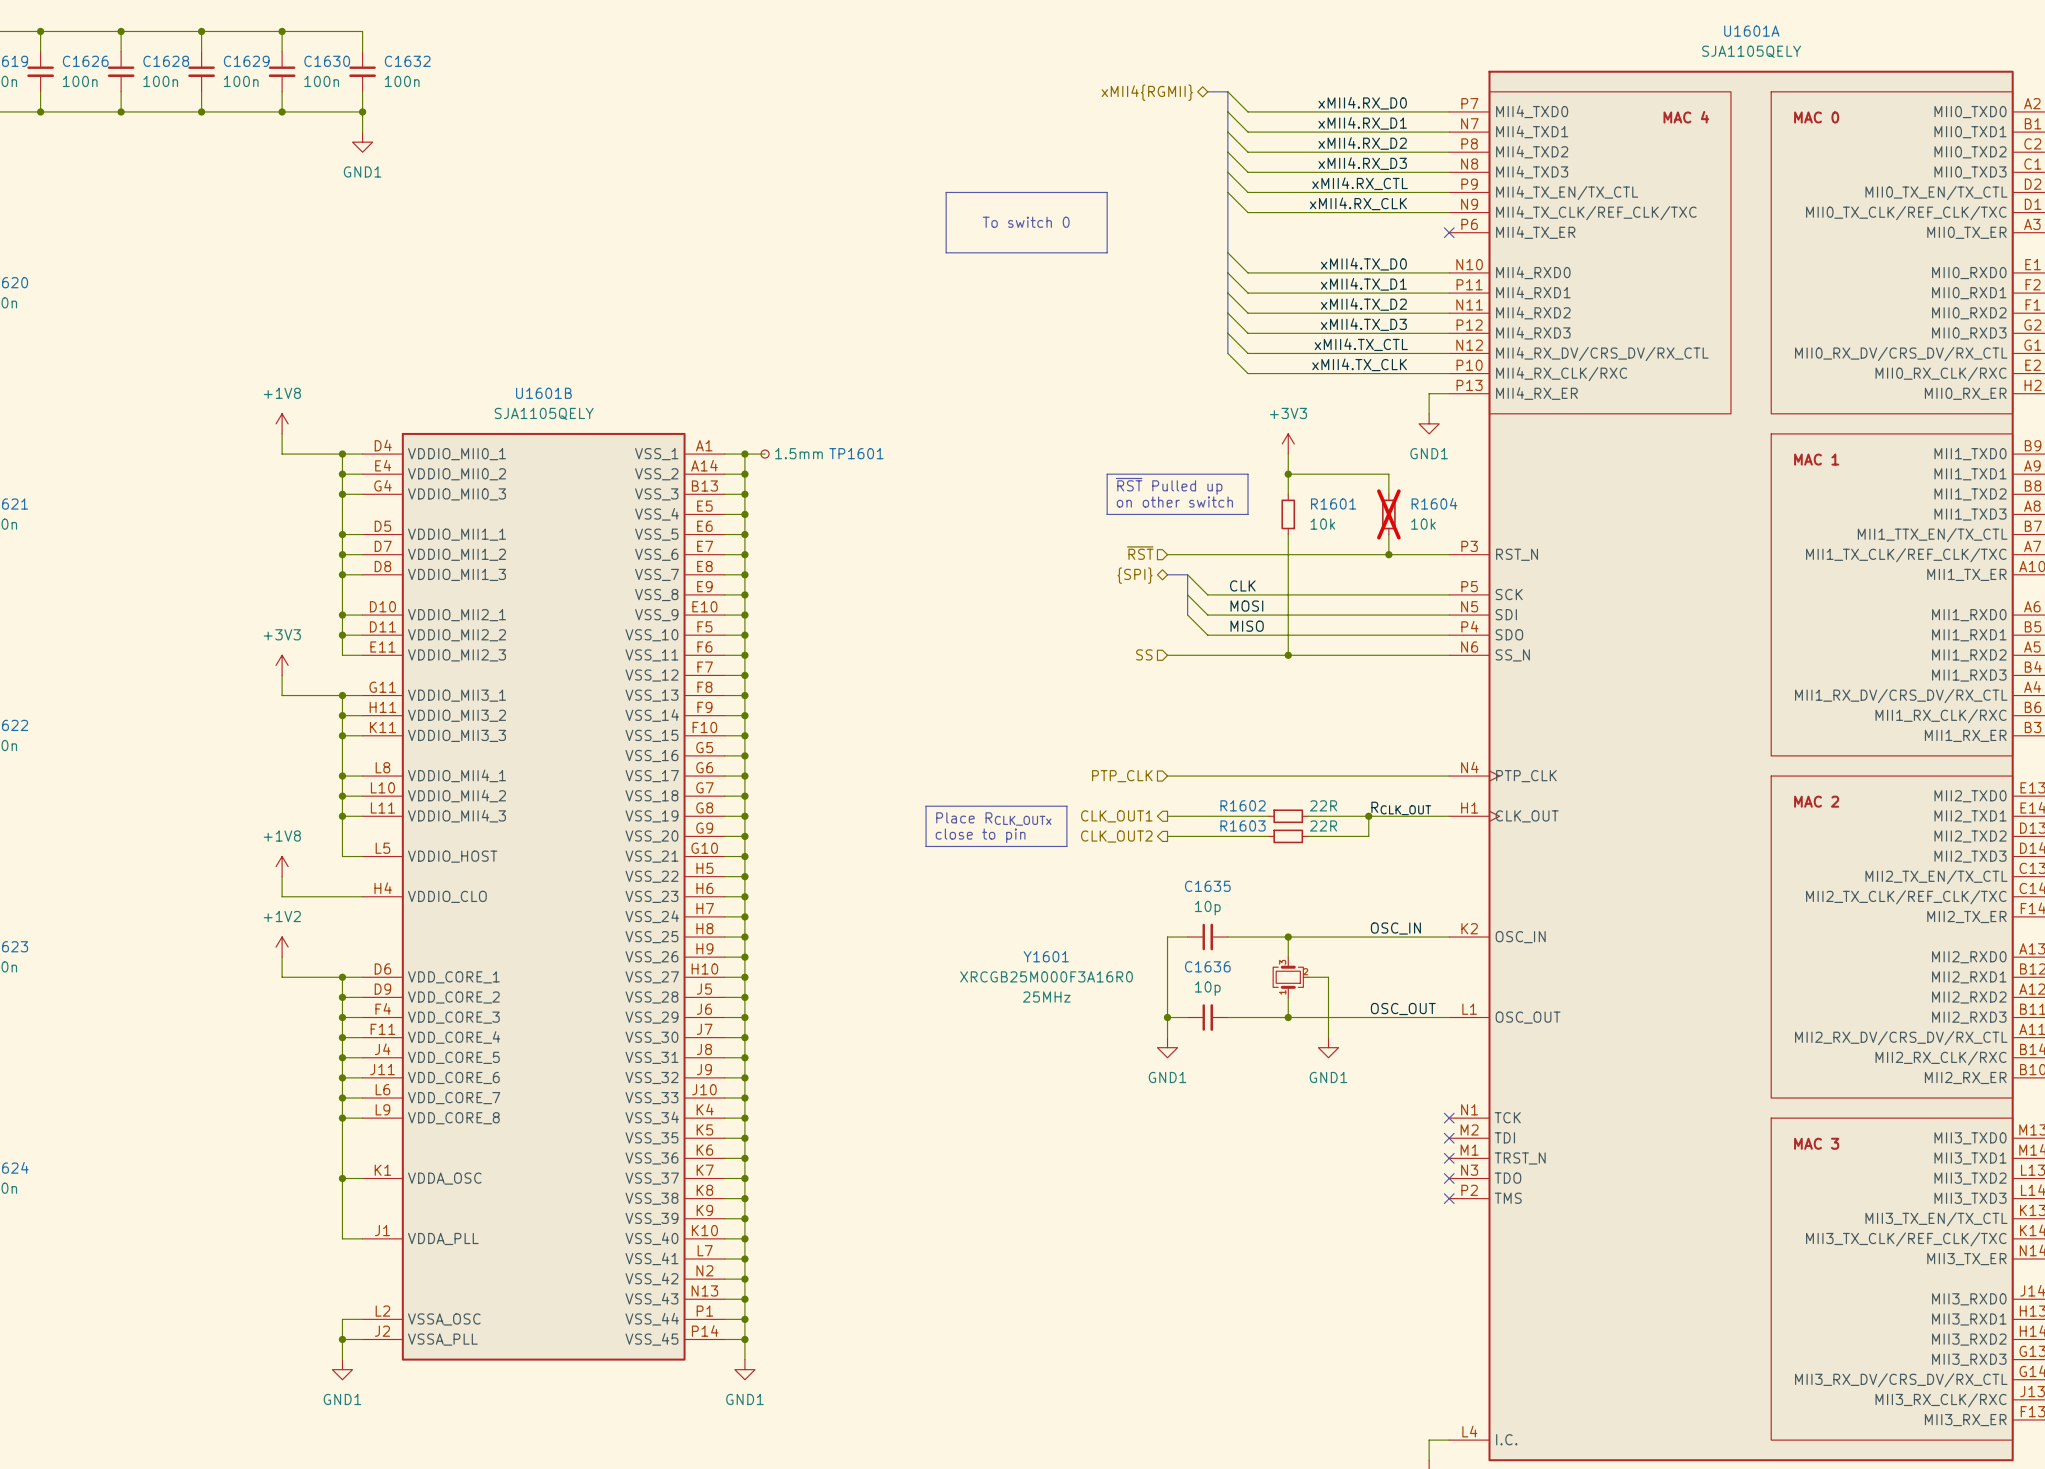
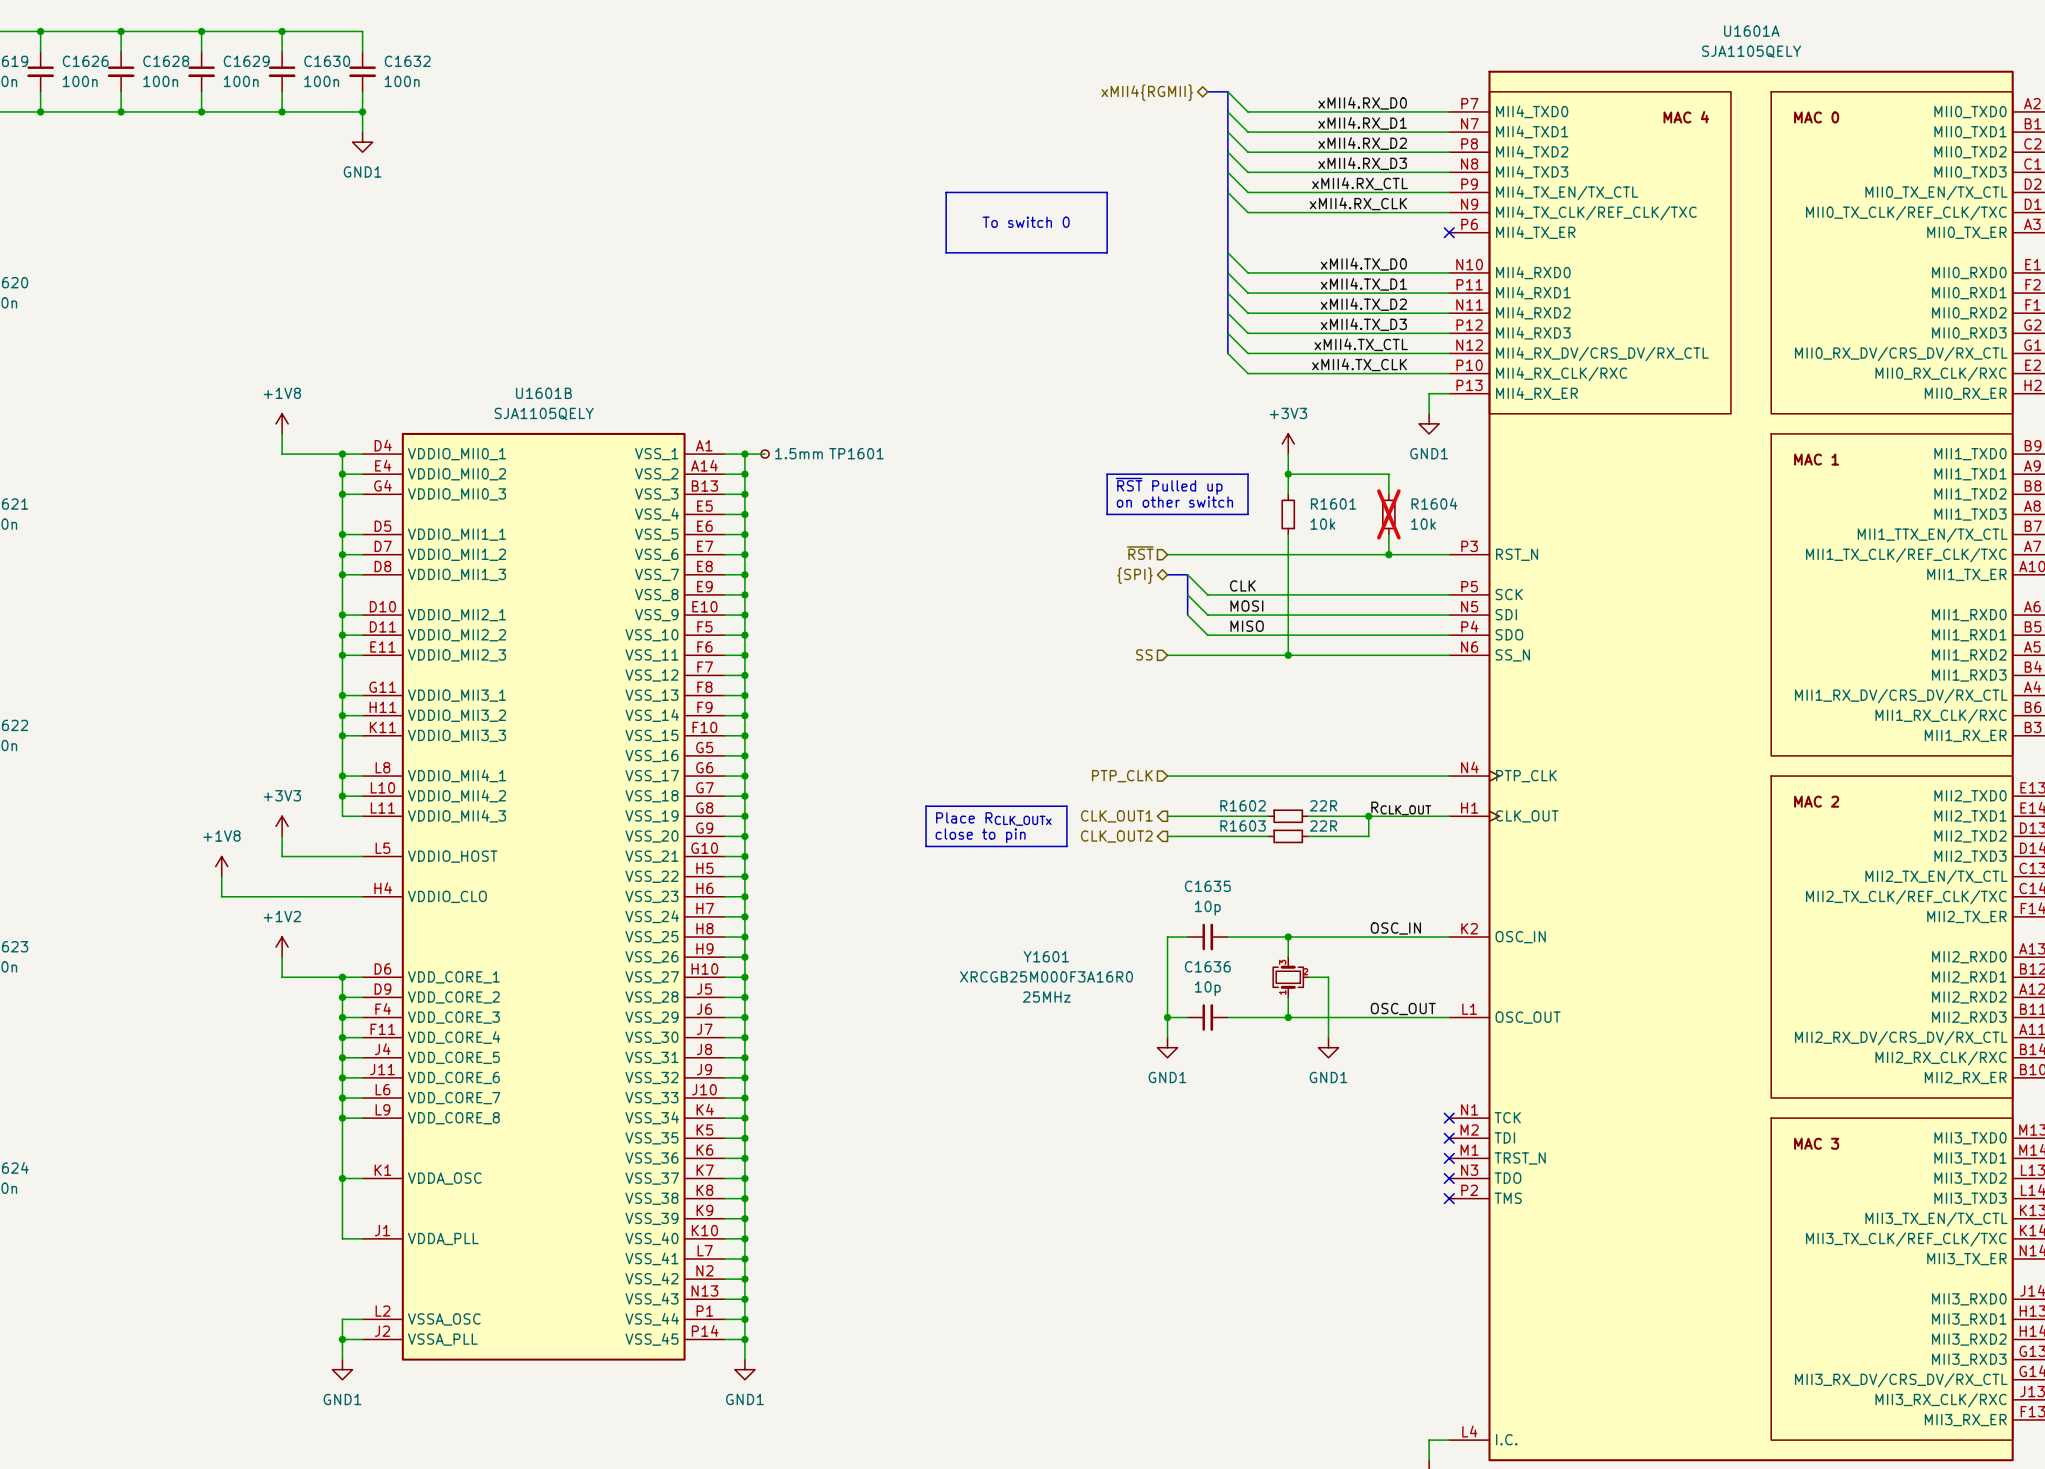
junction: none -> (342, 655)
power symbol position: +3V3 (282, 665) -> +3V3 (282, 826)
wire: (282, 675) (282, 695) (342, 695) -> (342, 655) (342, 695)
wire: (342, 816) (342, 856) -> (282, 836) (282, 856) (342, 856)
junction: (342, 816) -> none
power symbol position: +1V8 (282, 866) -> +1V8 (221, 866)
wire: (282, 876) (282, 896) -> (221, 876) (221, 896) (282, 896)

